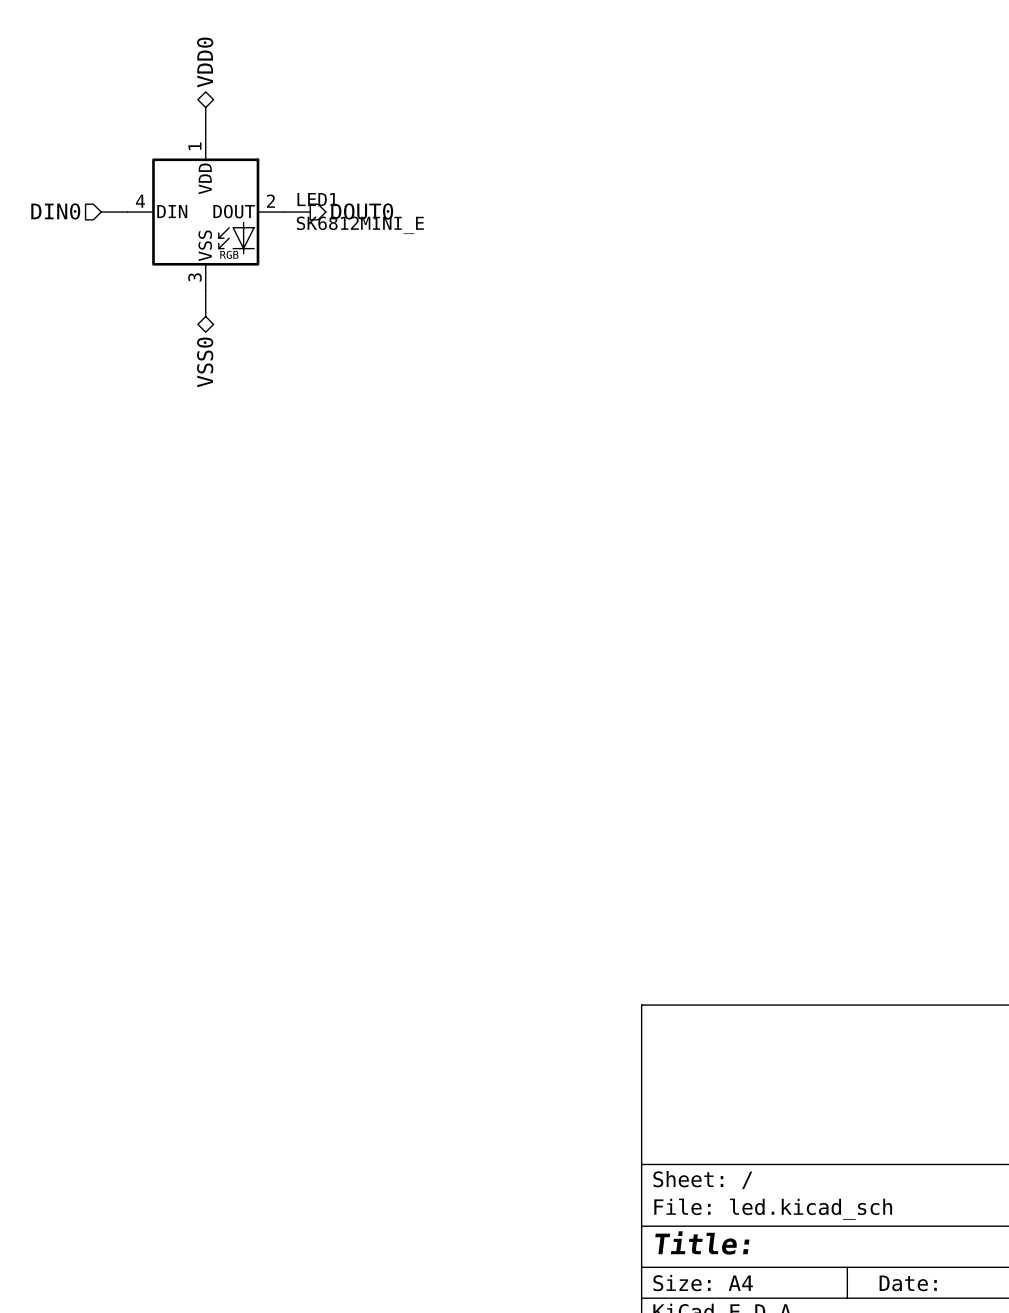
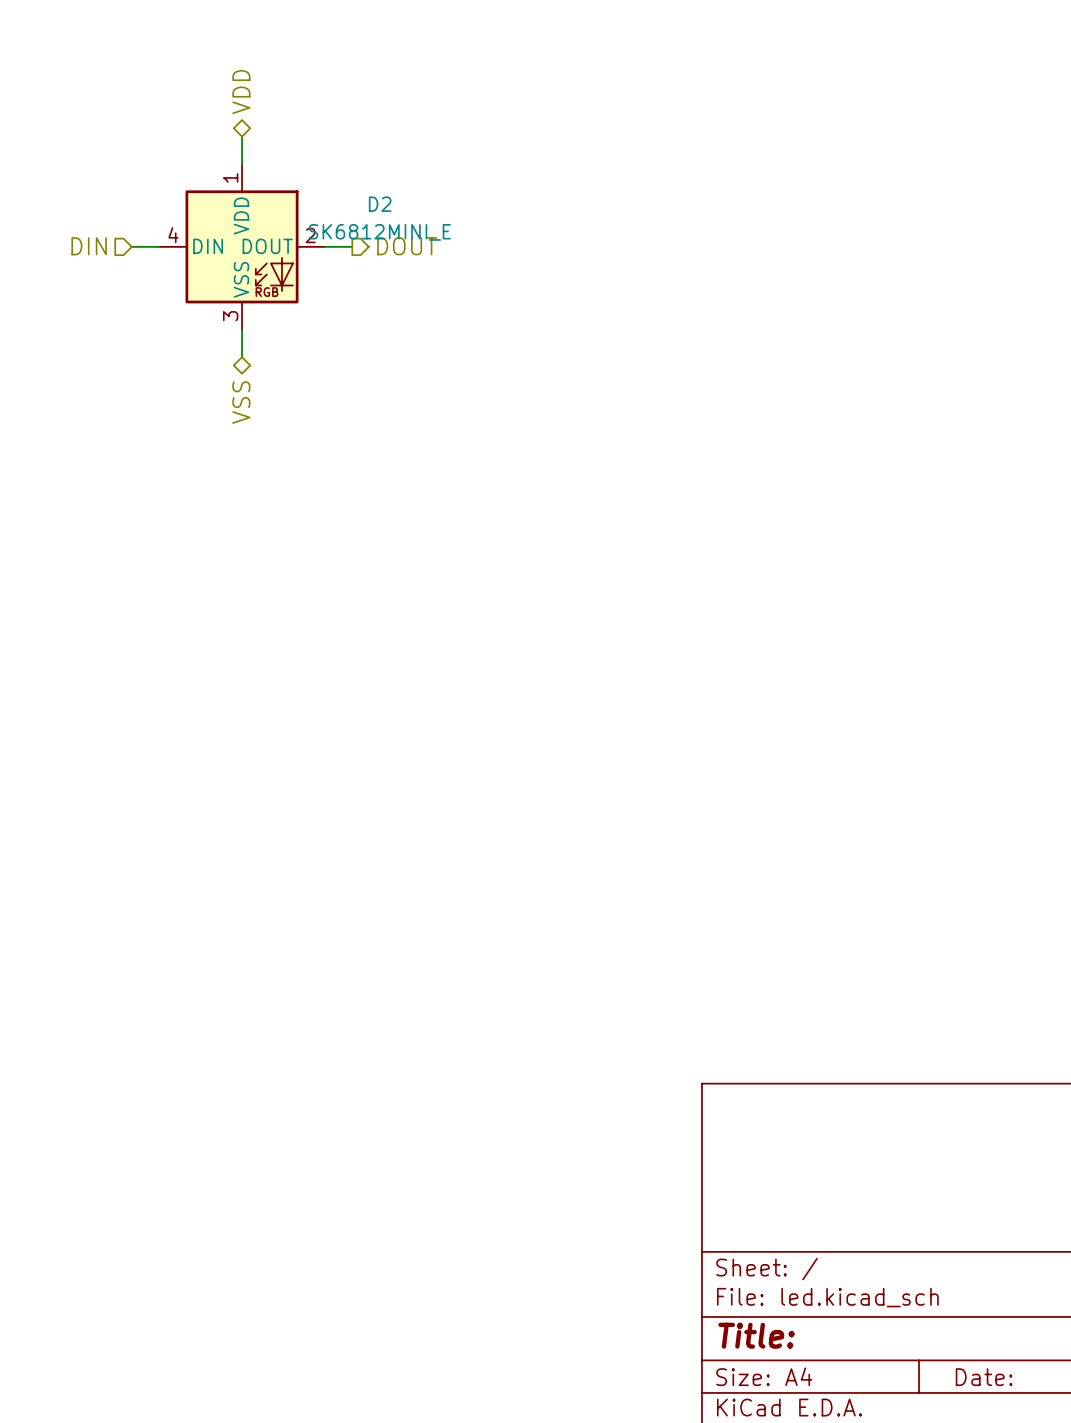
hierarchical label: VDD0 (205, 62) -> VDD (241, 92)
LED1 name: LED1 (317, 199) -> D2 (380, 204)
hierarchical label: DIN0 (55, 211) -> DIN (89, 246)
hierarchical label: DOUT0 (362, 211) -> DOUT (407, 246)
LED1 value position: SK6812MINI_E (360, 225) -> SK6812MINI_E (379, 232)
hierarchical label: VSS0 (205, 362) -> VSS (241, 402)

